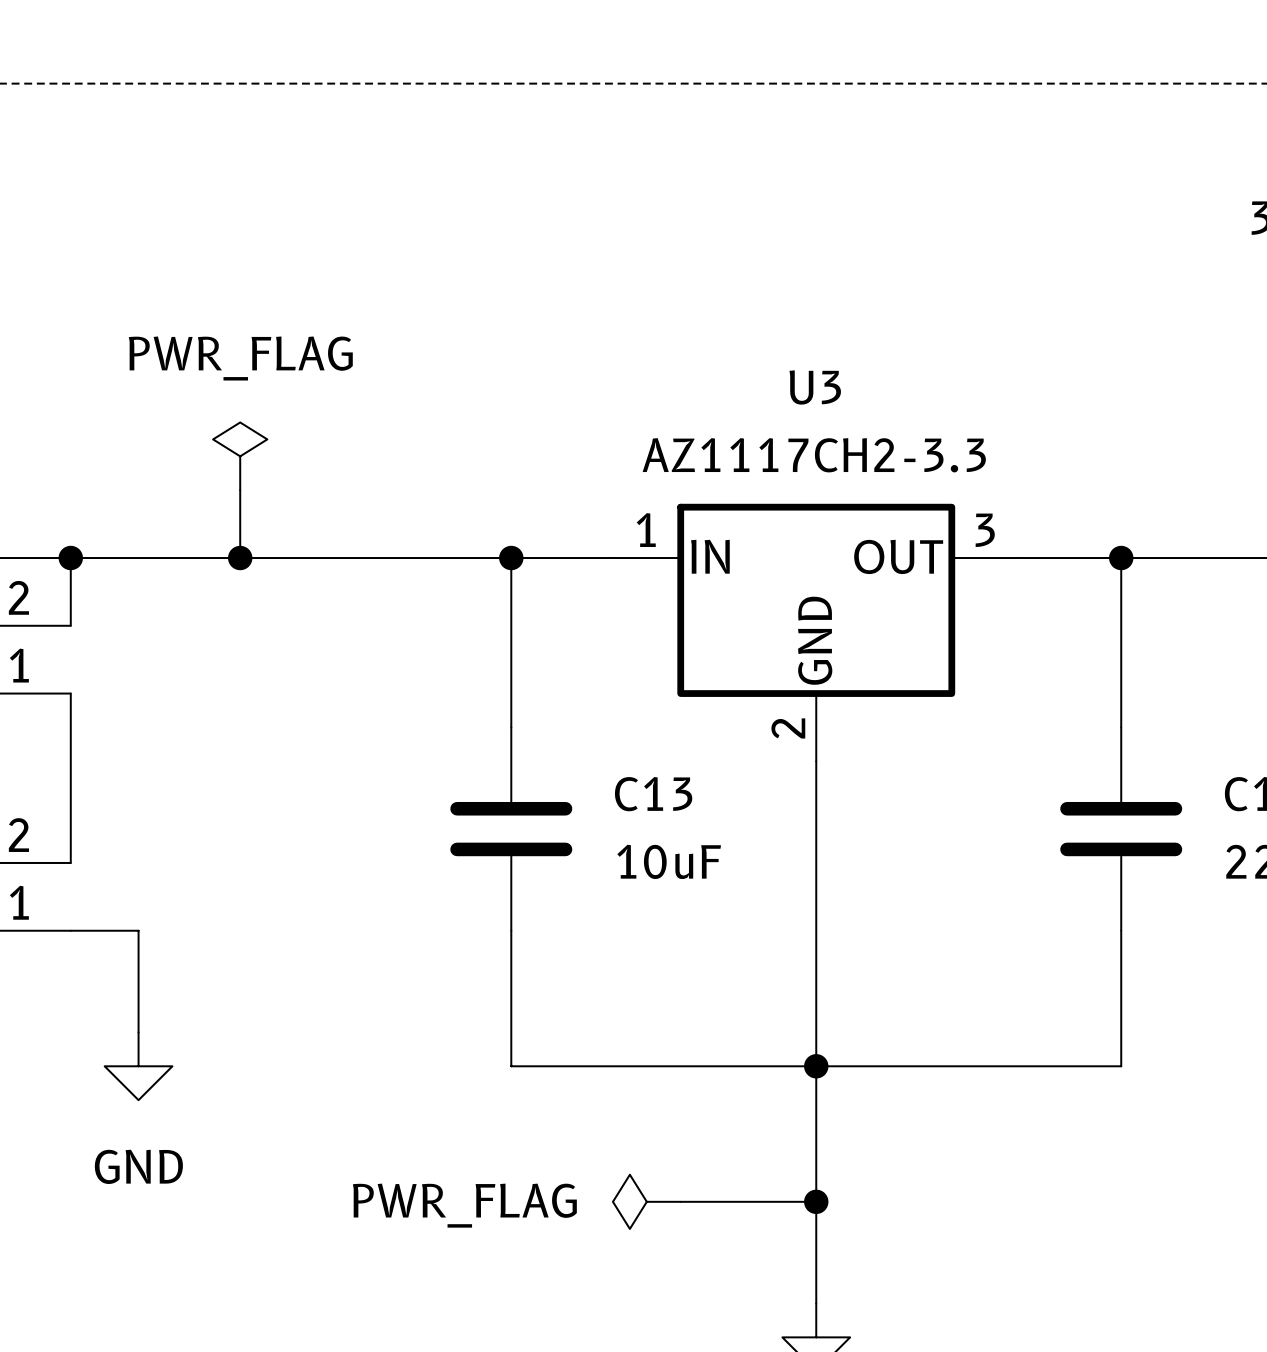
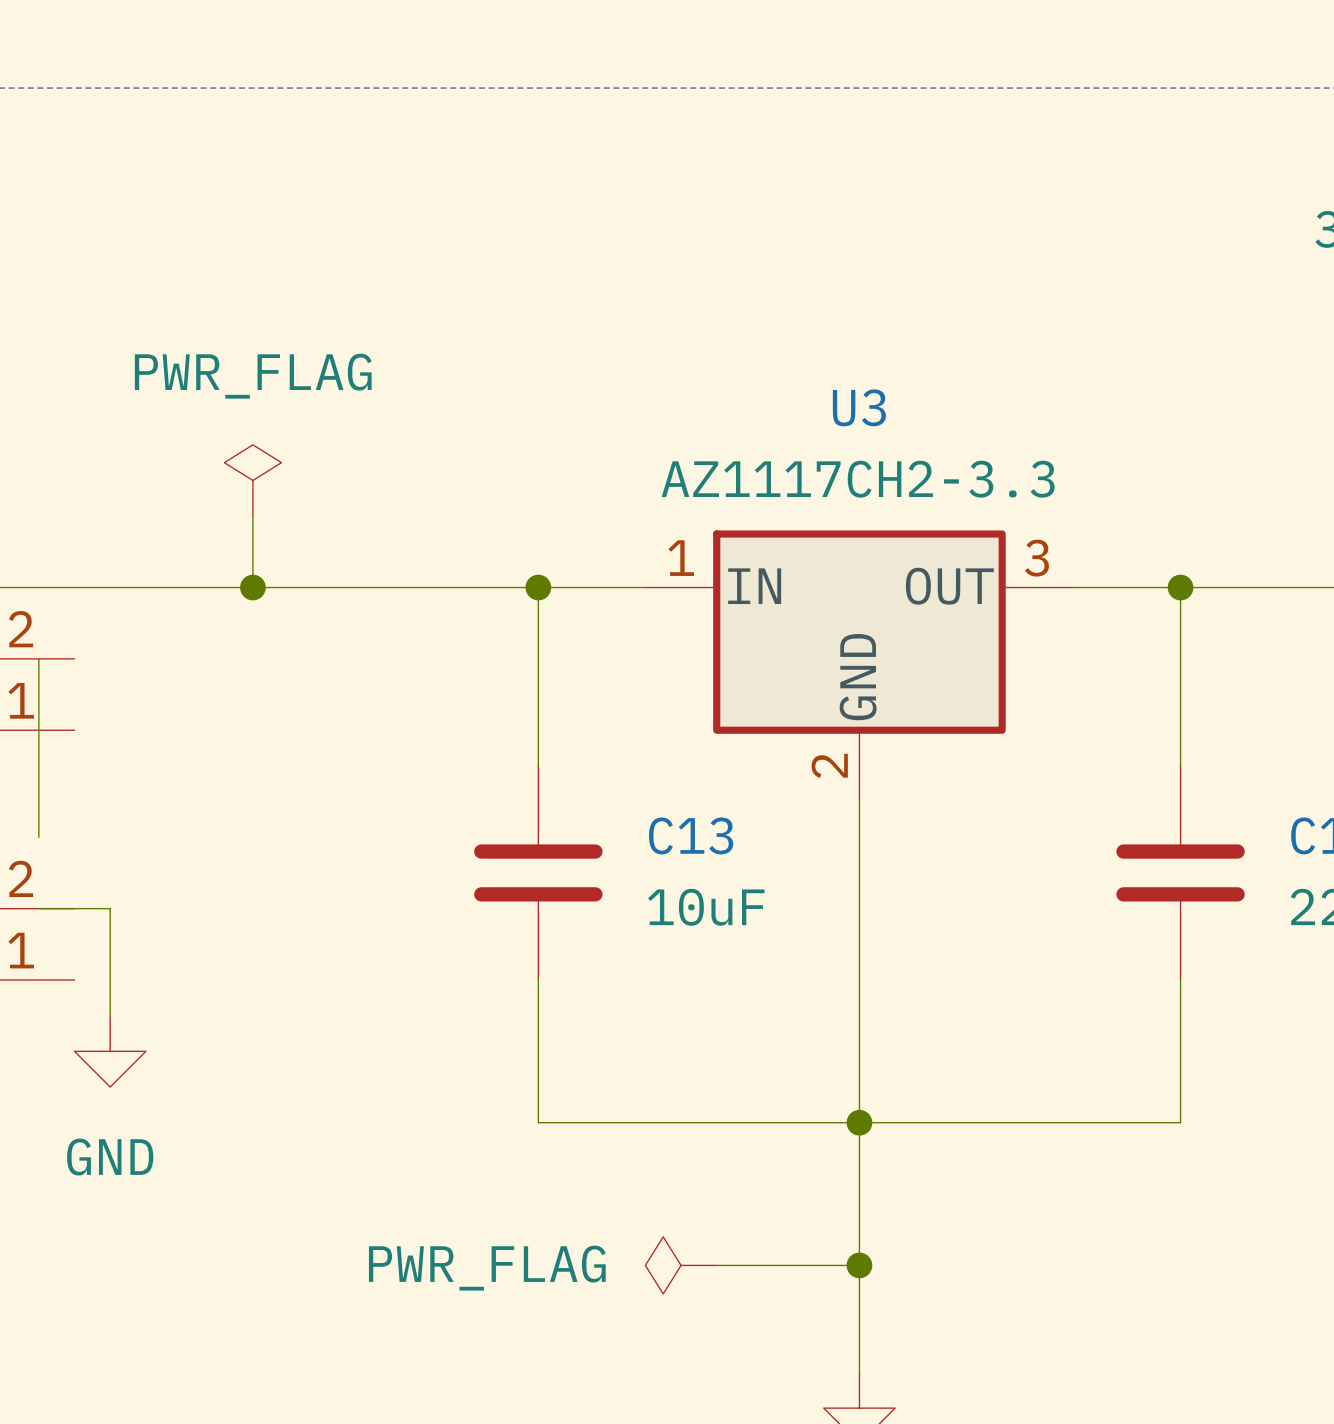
wire: (70, 558) (70, 625) -> none
junction: (70, 558) -> none
wire: (70, 693) (70, 862) -> (38, 658) (38, 837)
wire: (70, 930) (138, 930) (138, 1032) -> (38, 908) (110, 908) (110, 1015)
power symbol position: GND (138, 1066) -> GND (110, 1051)

